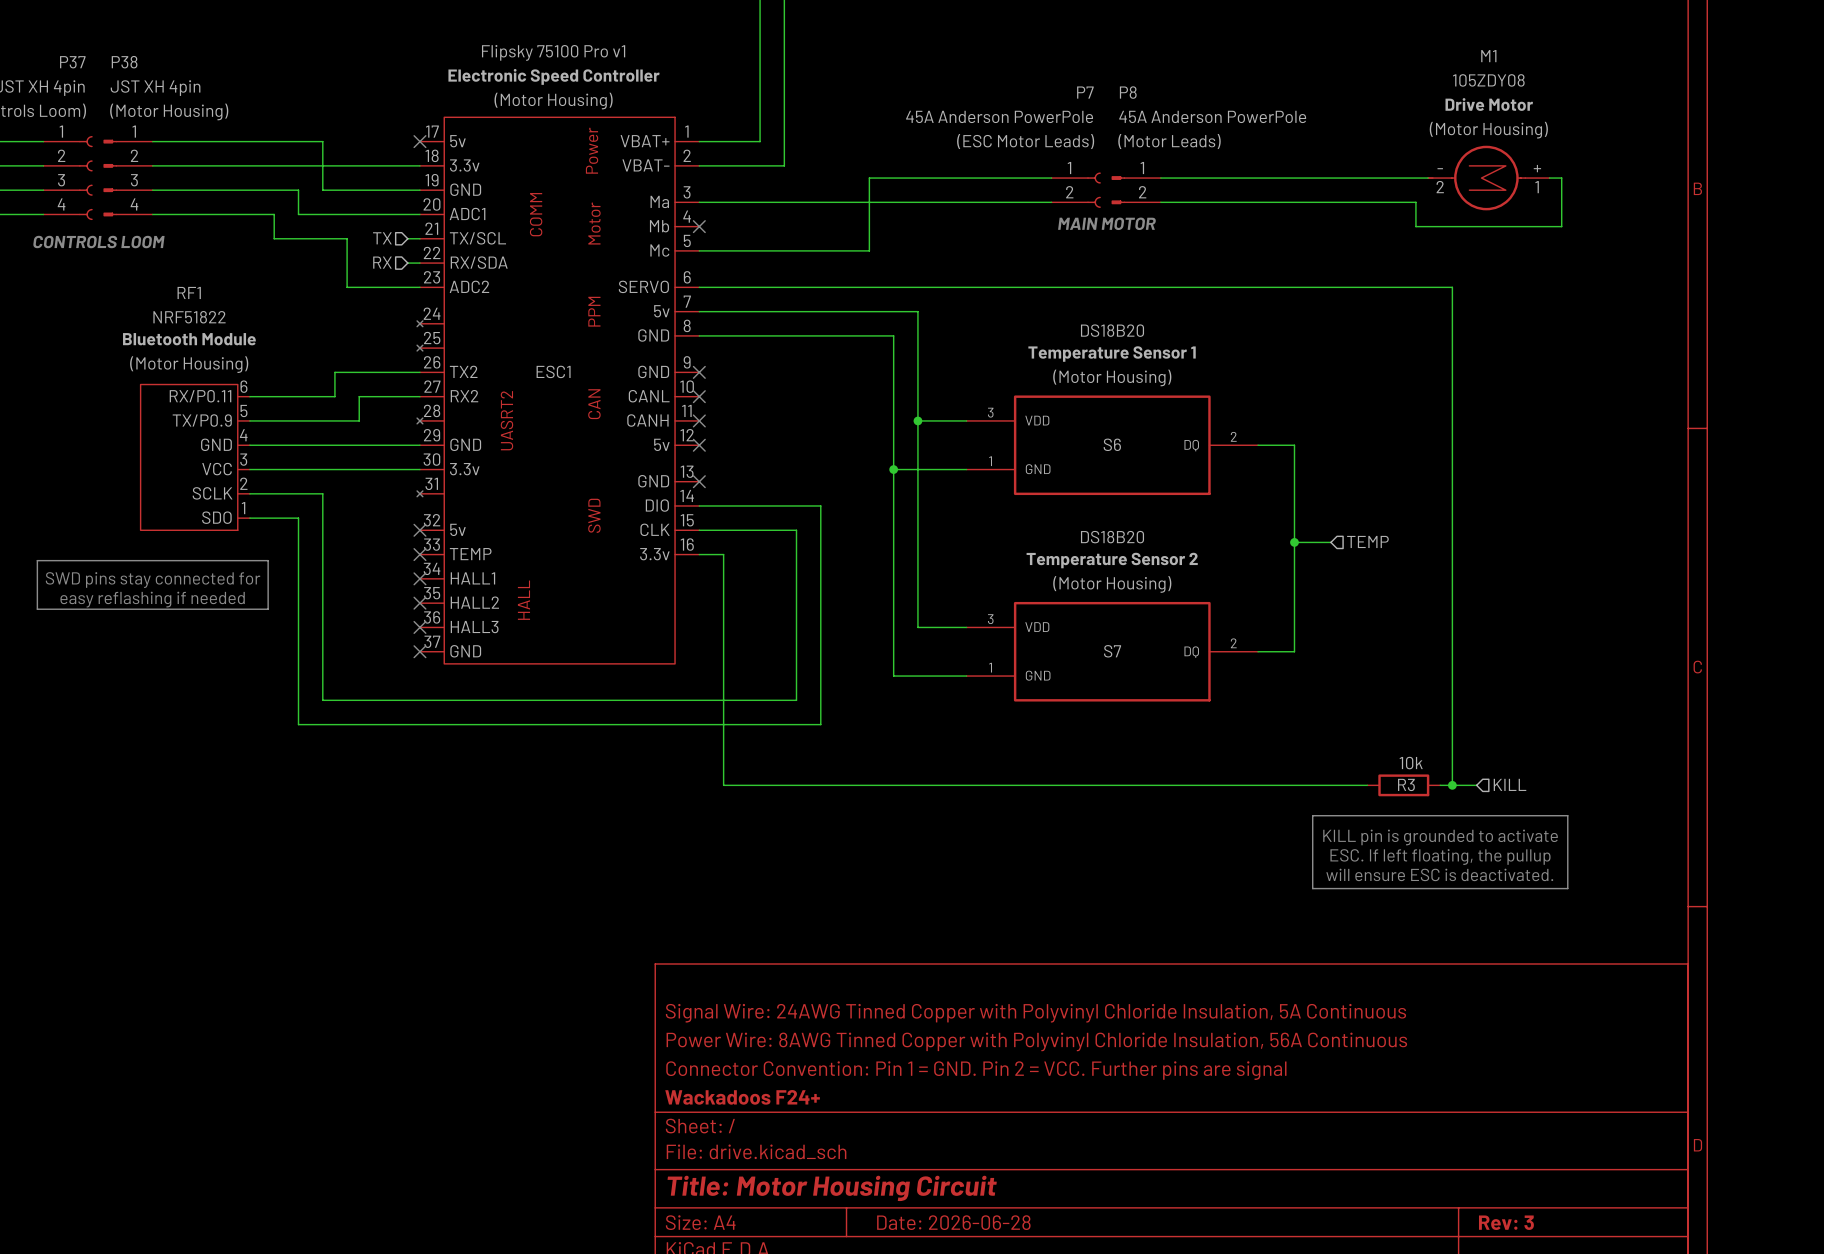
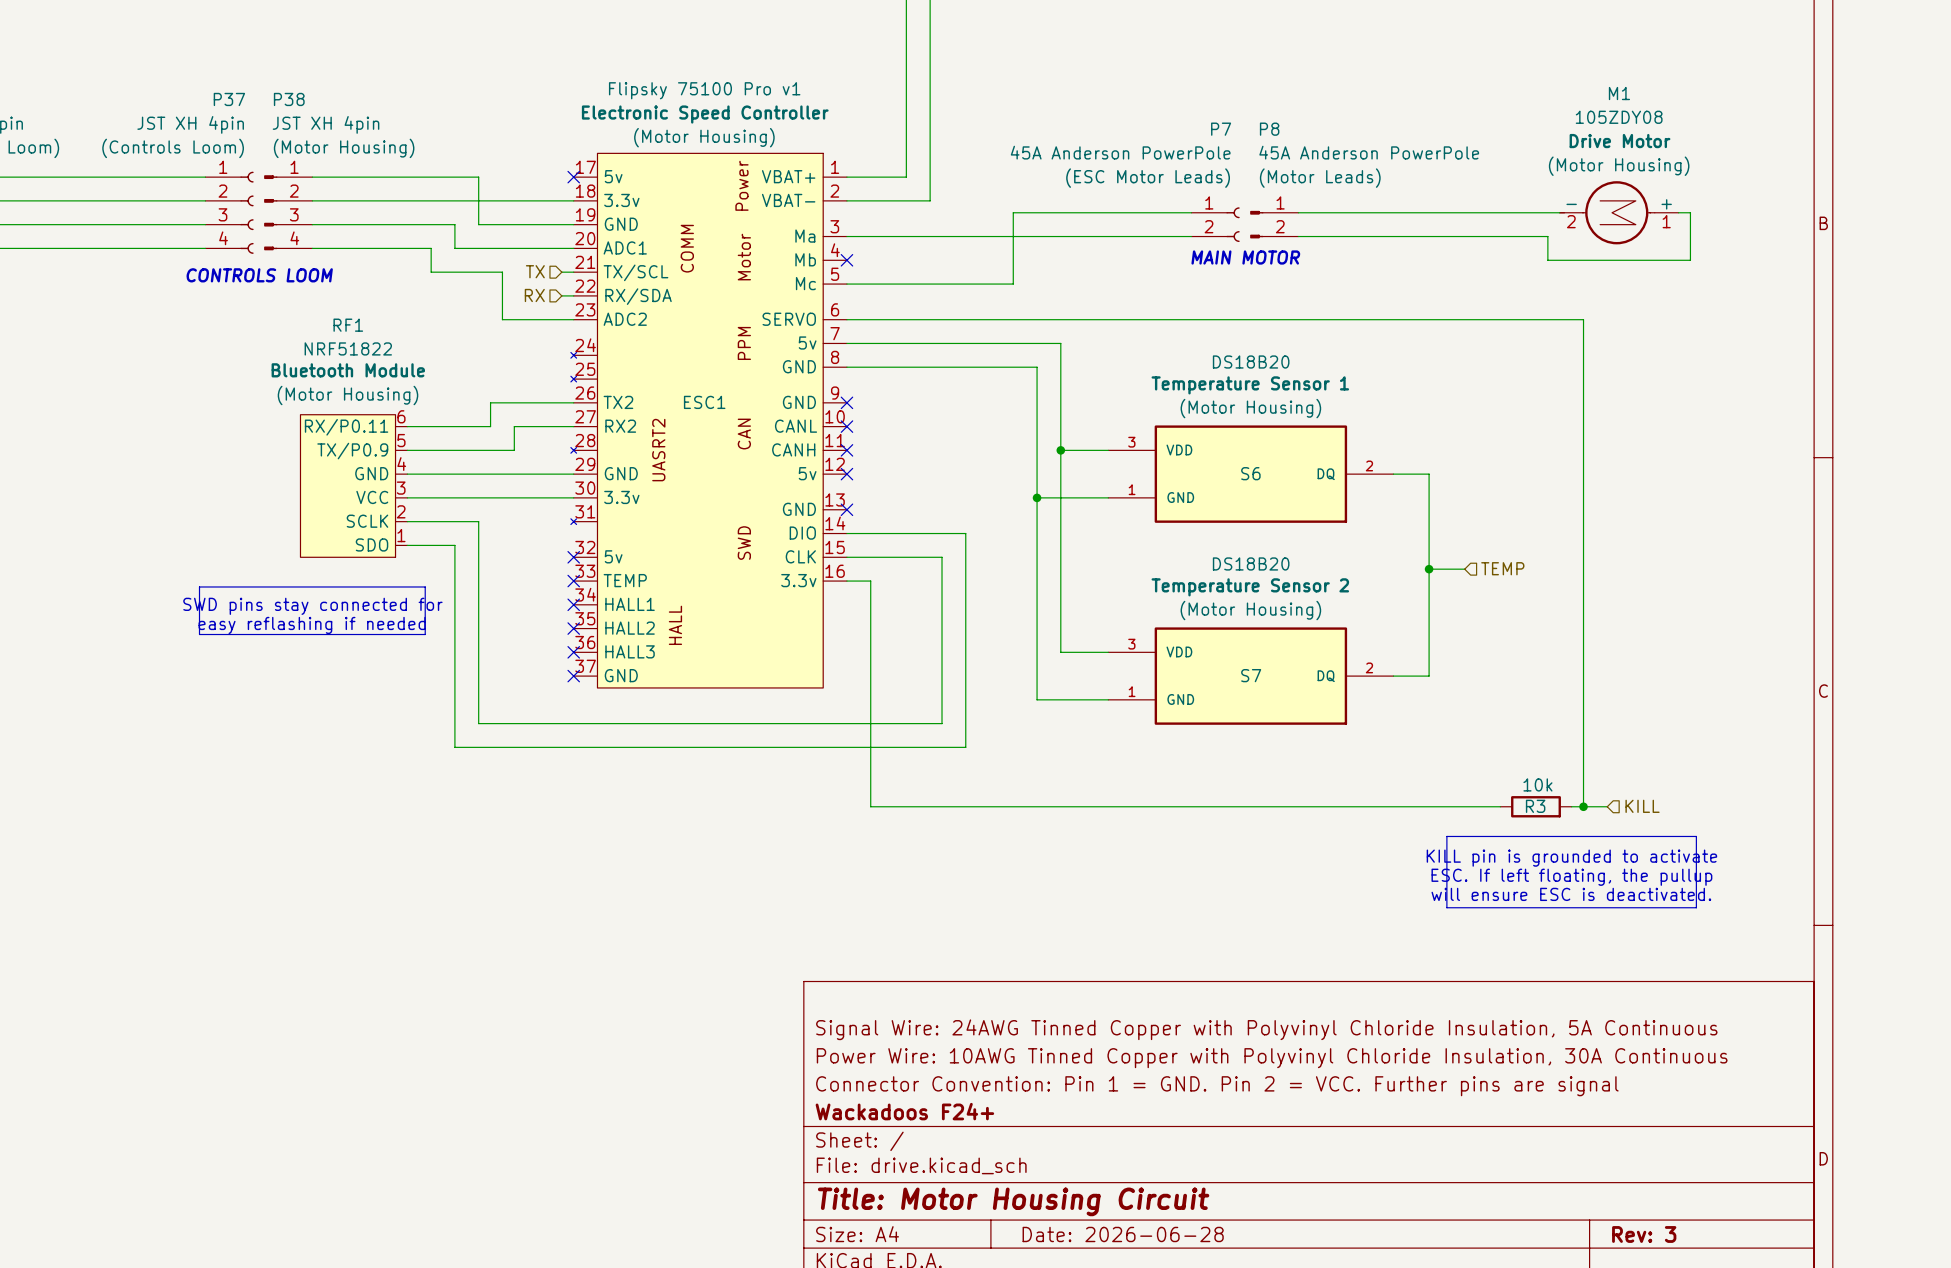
title block: Power Wire: 8AWG Tinned Copper with Polyvinyl Chloride Insulation, 56A Continuous (1036, 1041) -> Power Wire: 10AWG Tinned Copper with Polyvinyl Chloride Insulation, 30A Continuous (1272, 1058)

